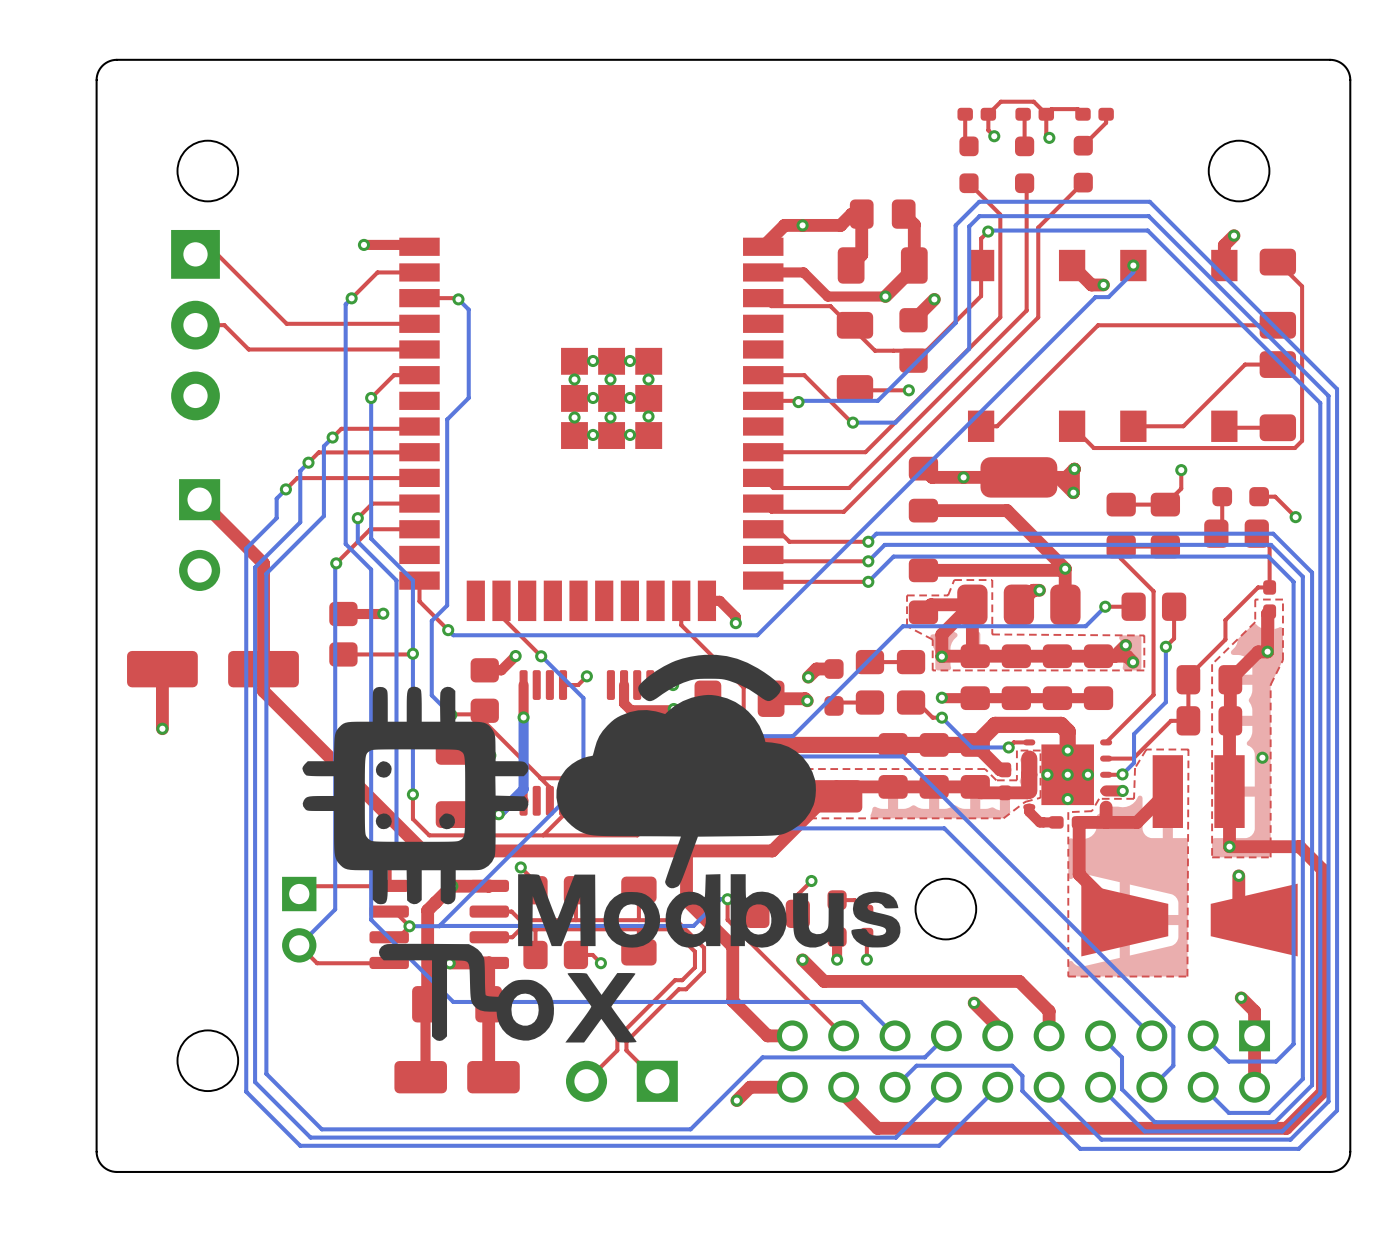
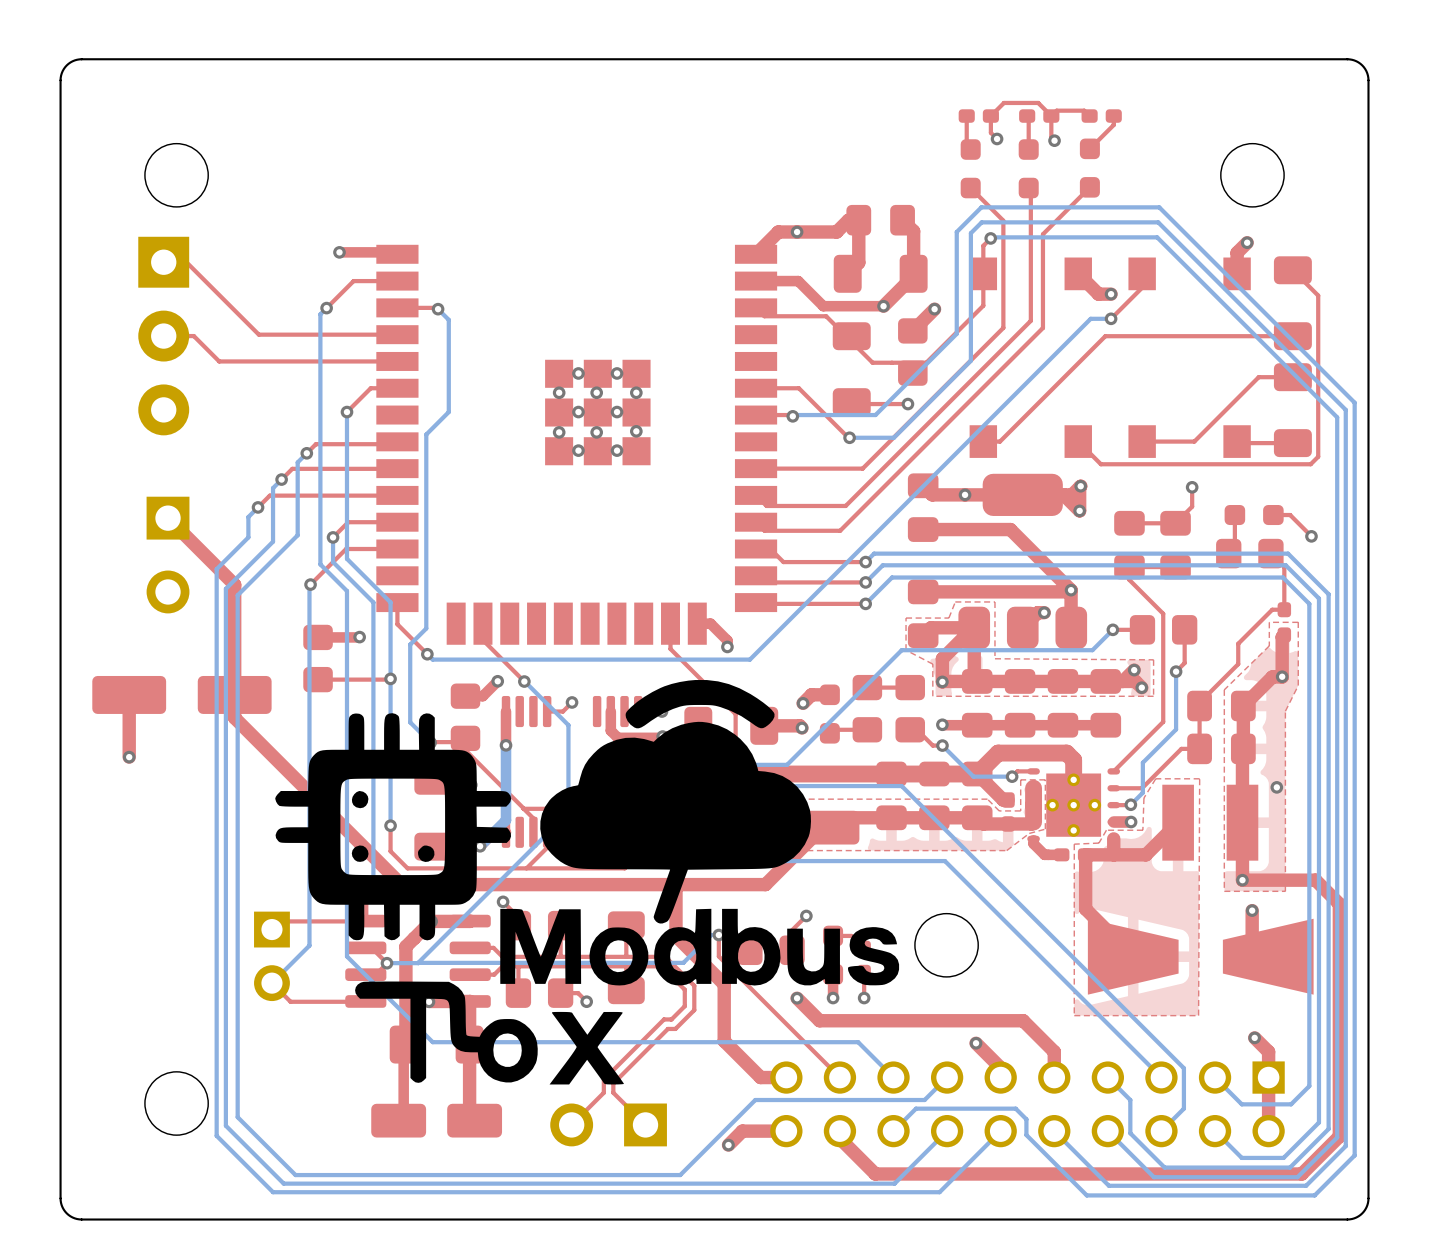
top track: none -> (1142, 273) (1142, 287) (1111, 318)
bottom track: (1133, 265) (1133, 272) (1108, 297) (1095, 297) (1084, 308) -> (1111, 318) (1090, 318)
via position: (1133, 265) -> (1111, 318)

